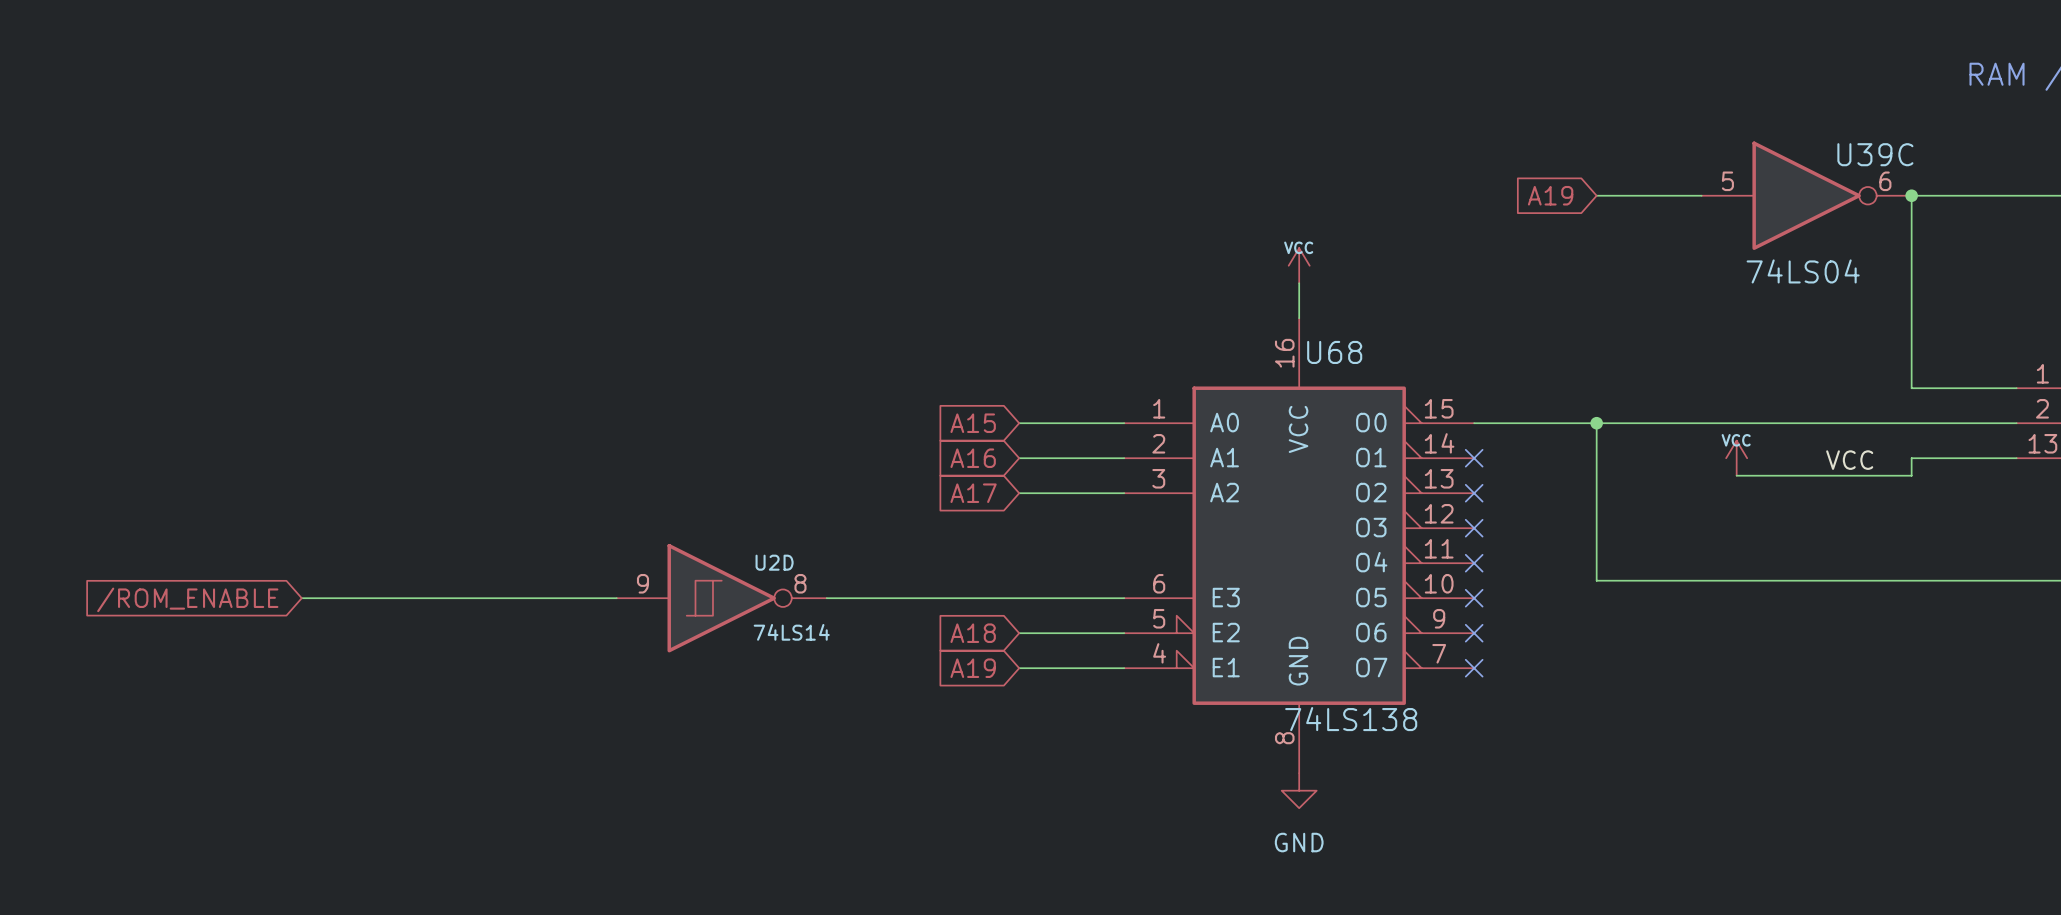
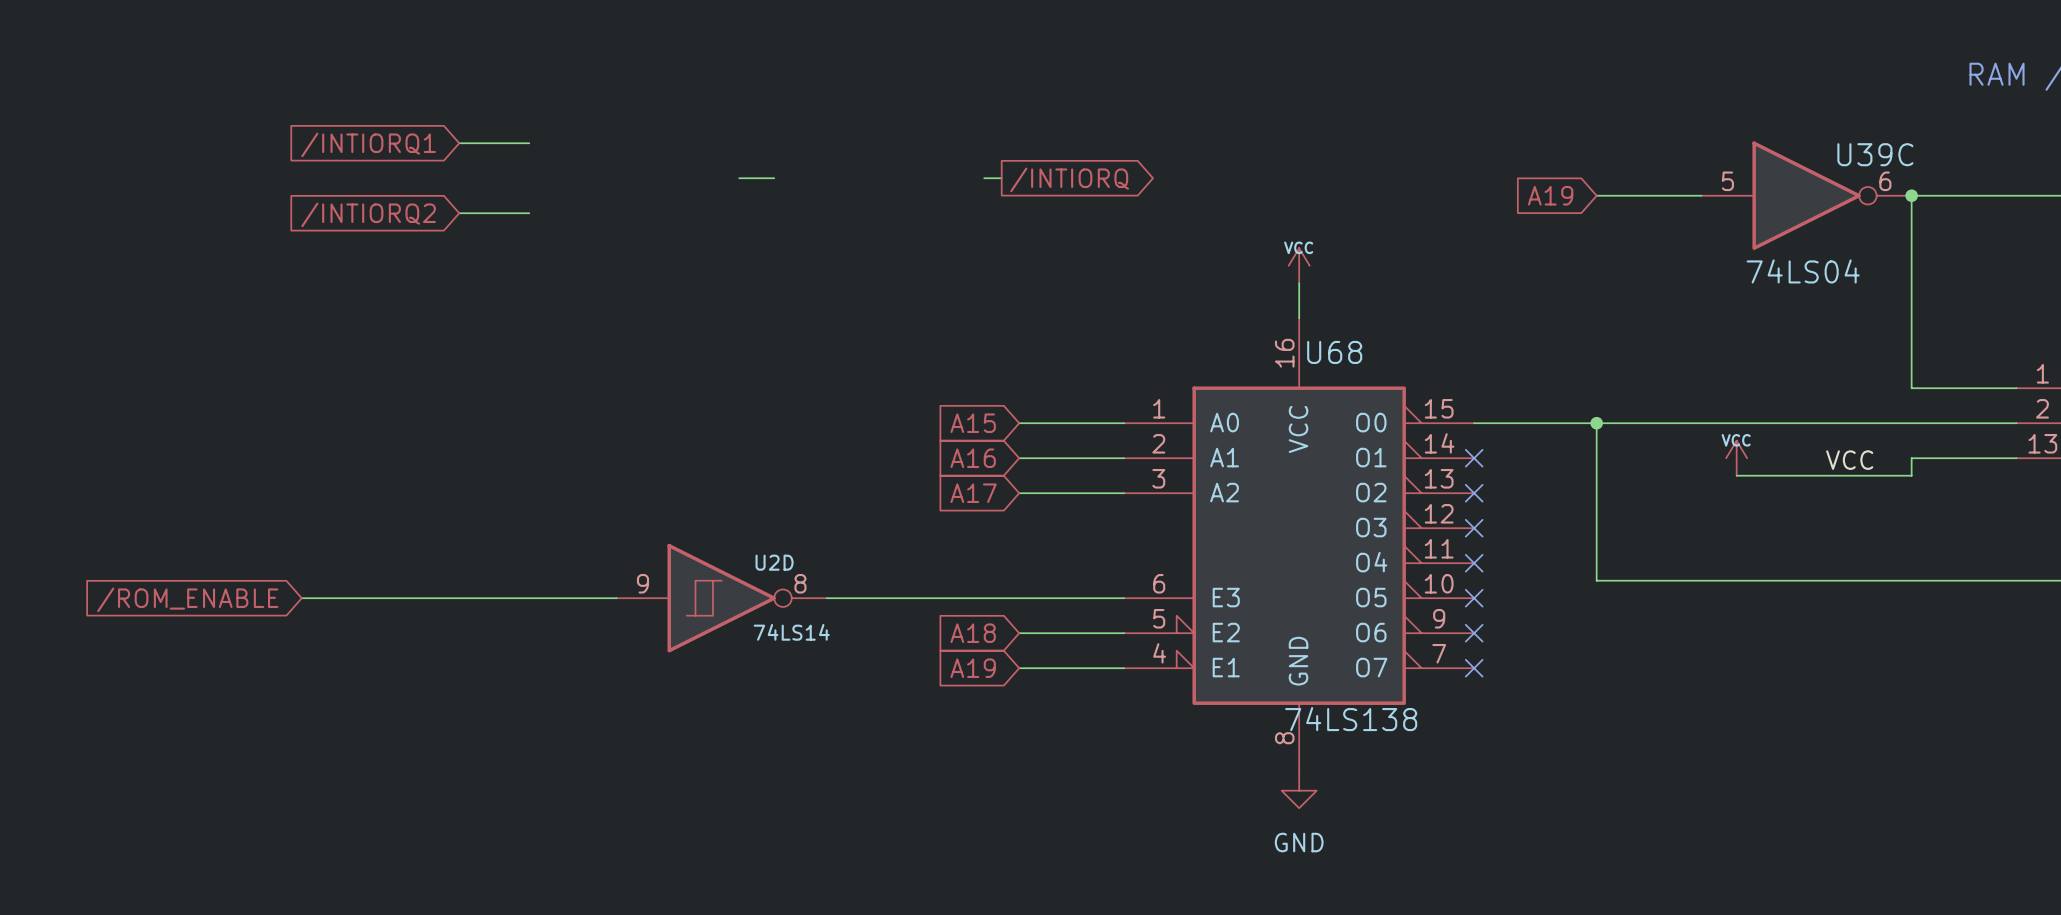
wire: none -> (459, 143) (529, 143)
global label: none -> /INTIORQ1 (368, 144)
wire: none -> (739, 178) (774, 178)
wire: none -> (984, 178) (1001, 178)
global label: none -> /INTIORQ (1069, 179)
wire: none -> (459, 213) (529, 213)
global label: none -> /INTIORQ2 (368, 214)

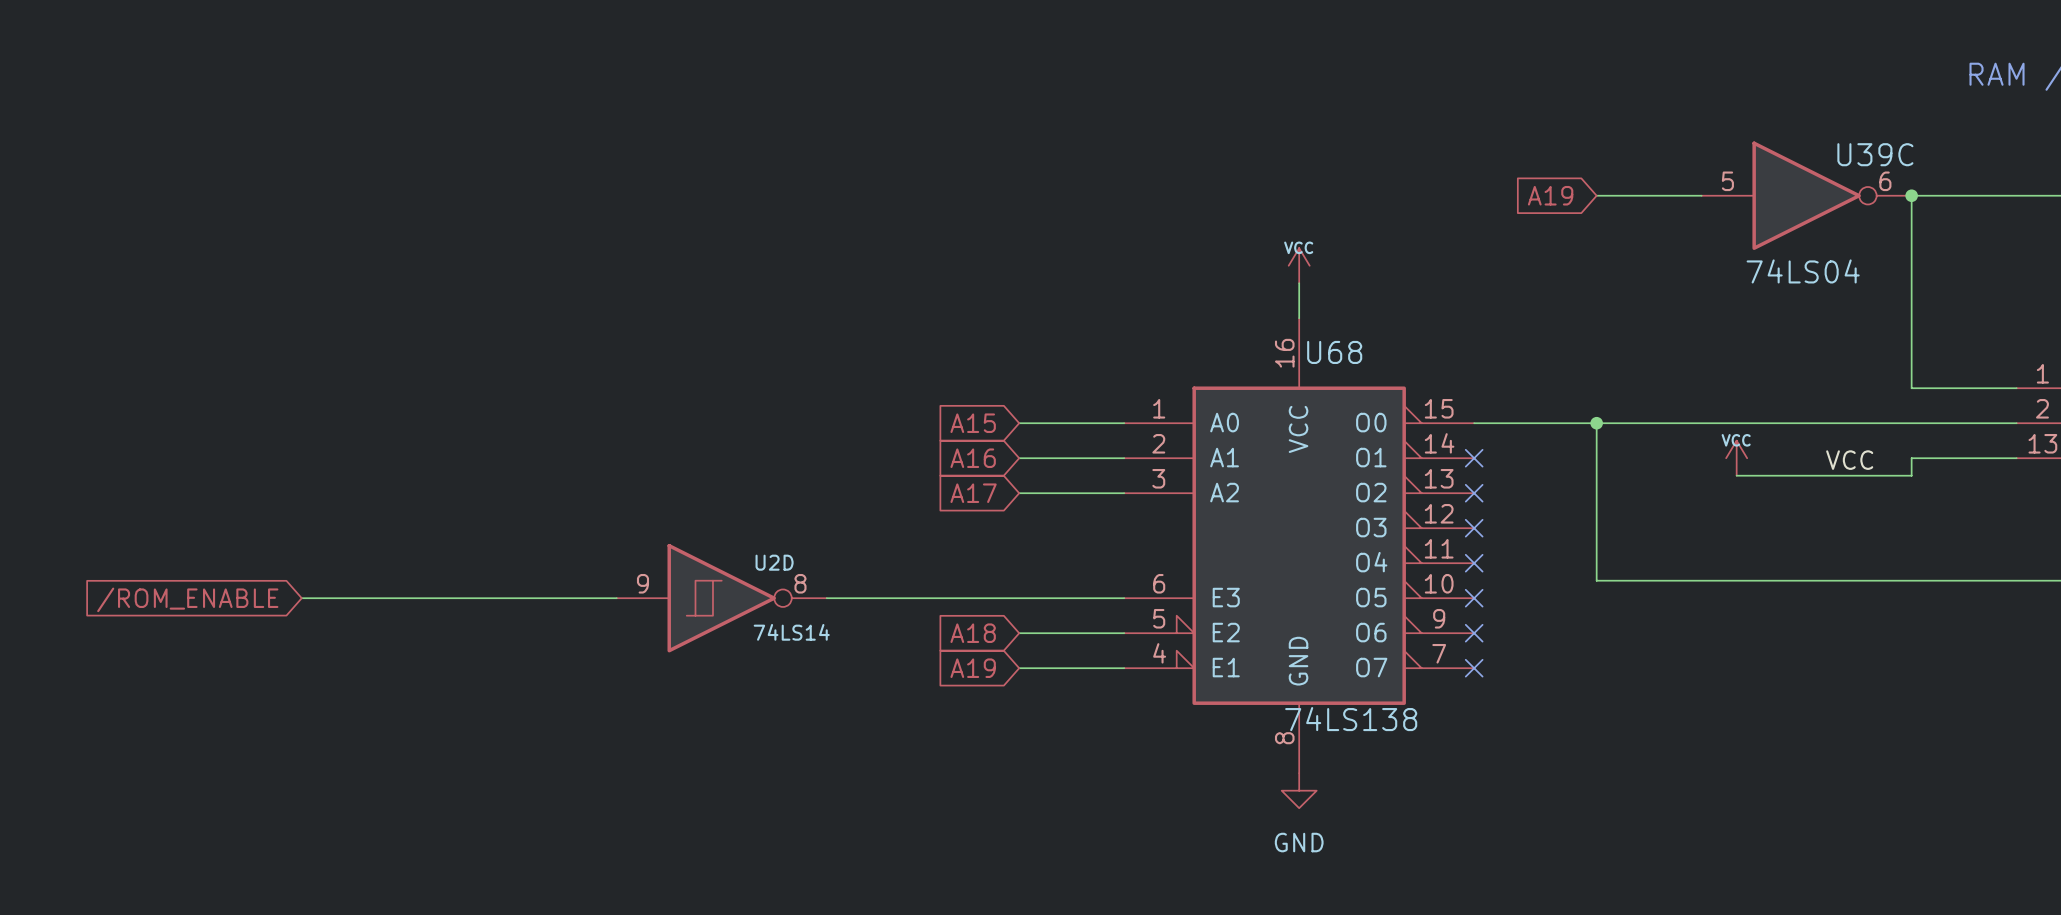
wire: (459, 143) (529, 143) -> none
global label: /INTIORQ1 (368, 144) -> none
wire: (739, 178) (774, 178) -> none
wire: (984, 178) (1001, 178) -> none
global label: /INTIORQ (1069, 179) -> none
wire: (459, 213) (529, 213) -> none
global label: /INTIORQ2 (368, 214) -> none

